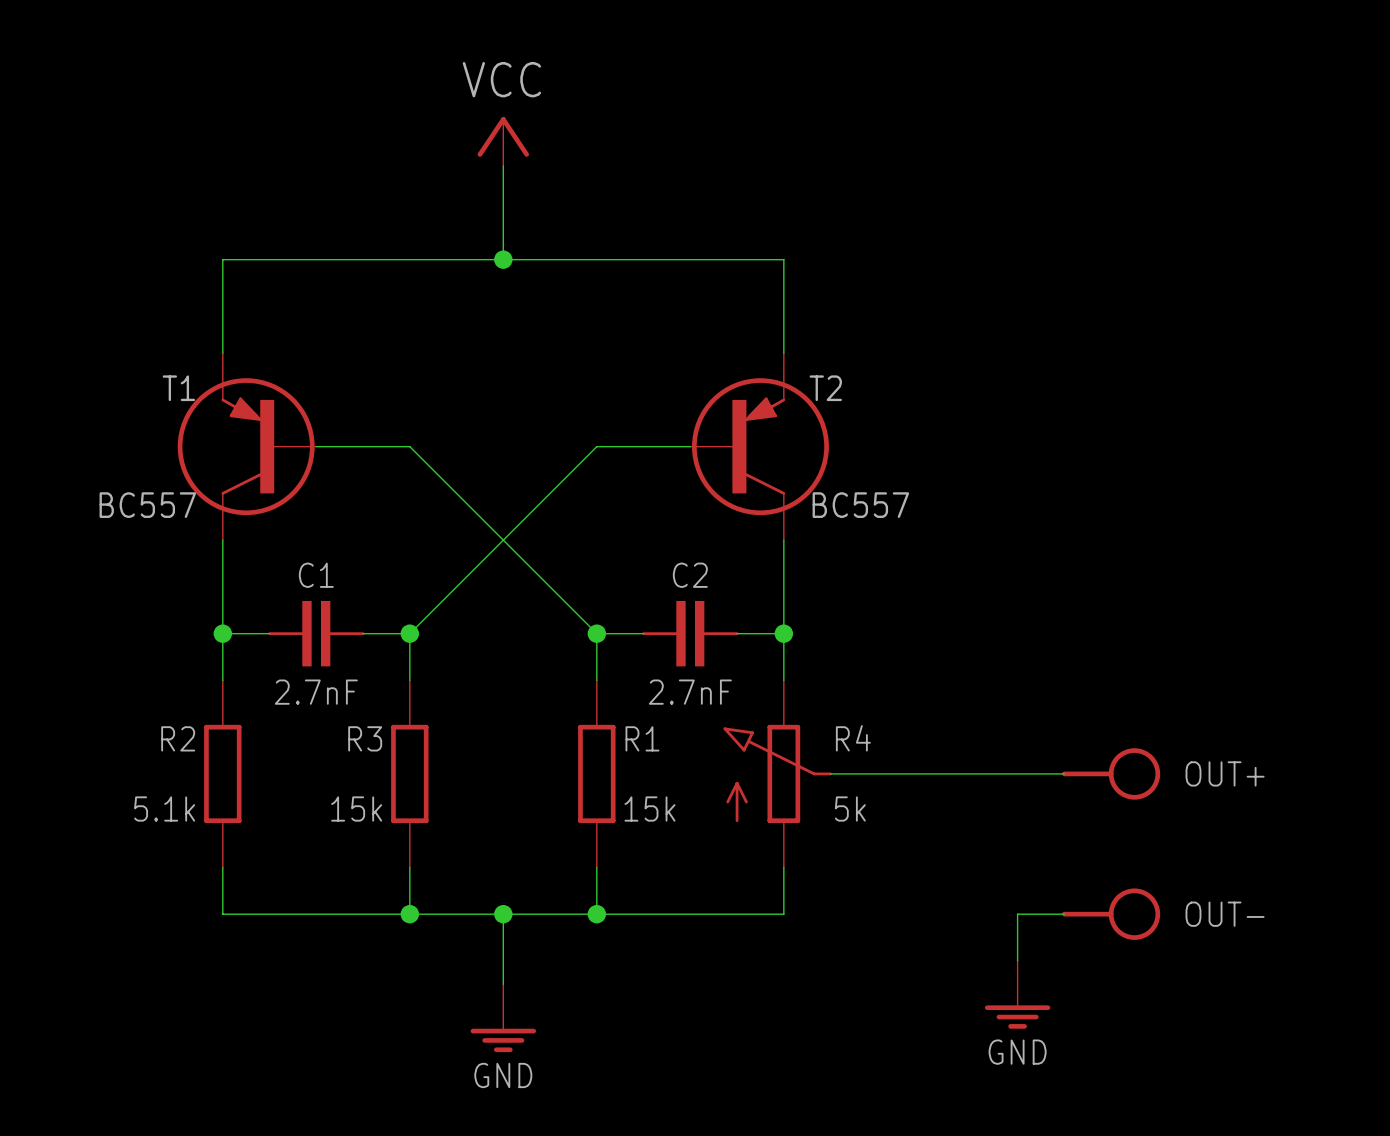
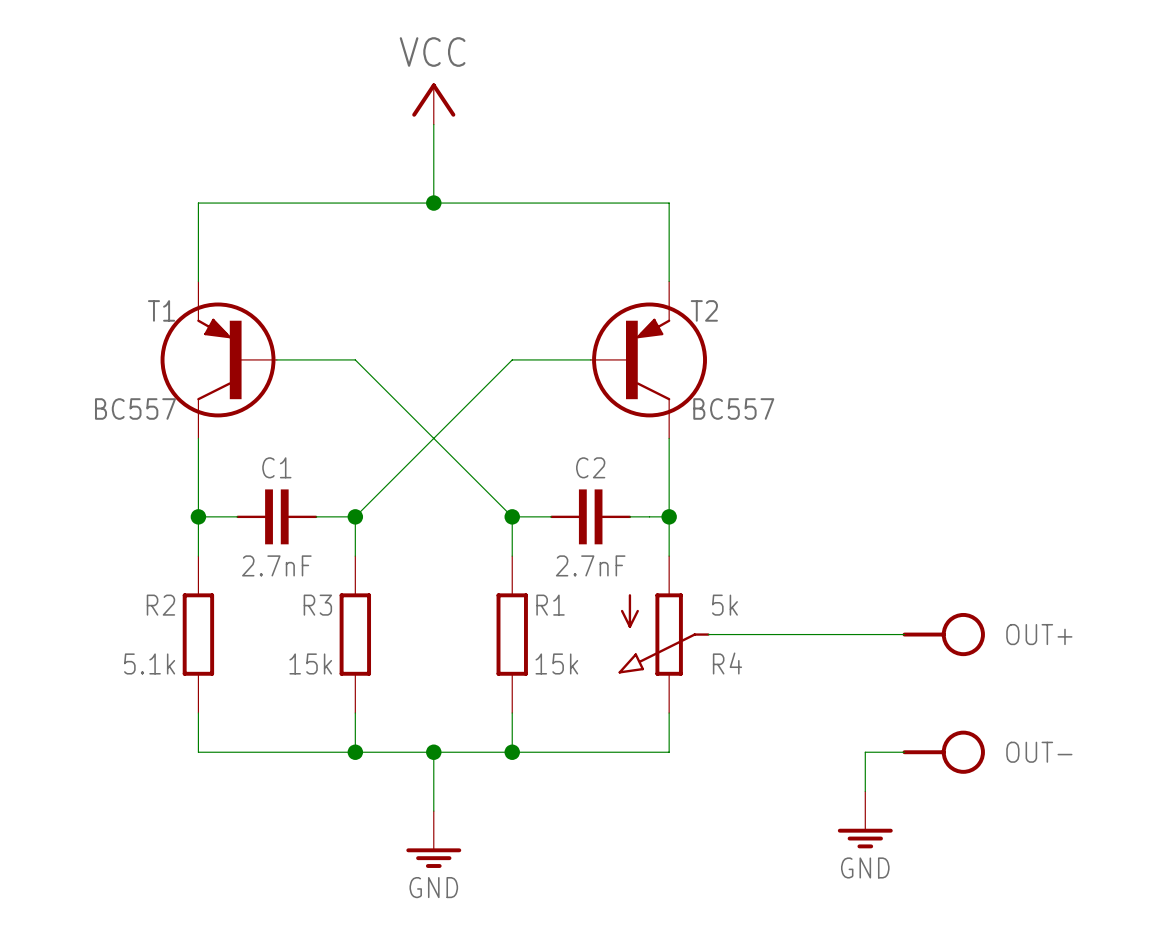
R4 flip: as is (777, 773) -> up-down (664, 634)

